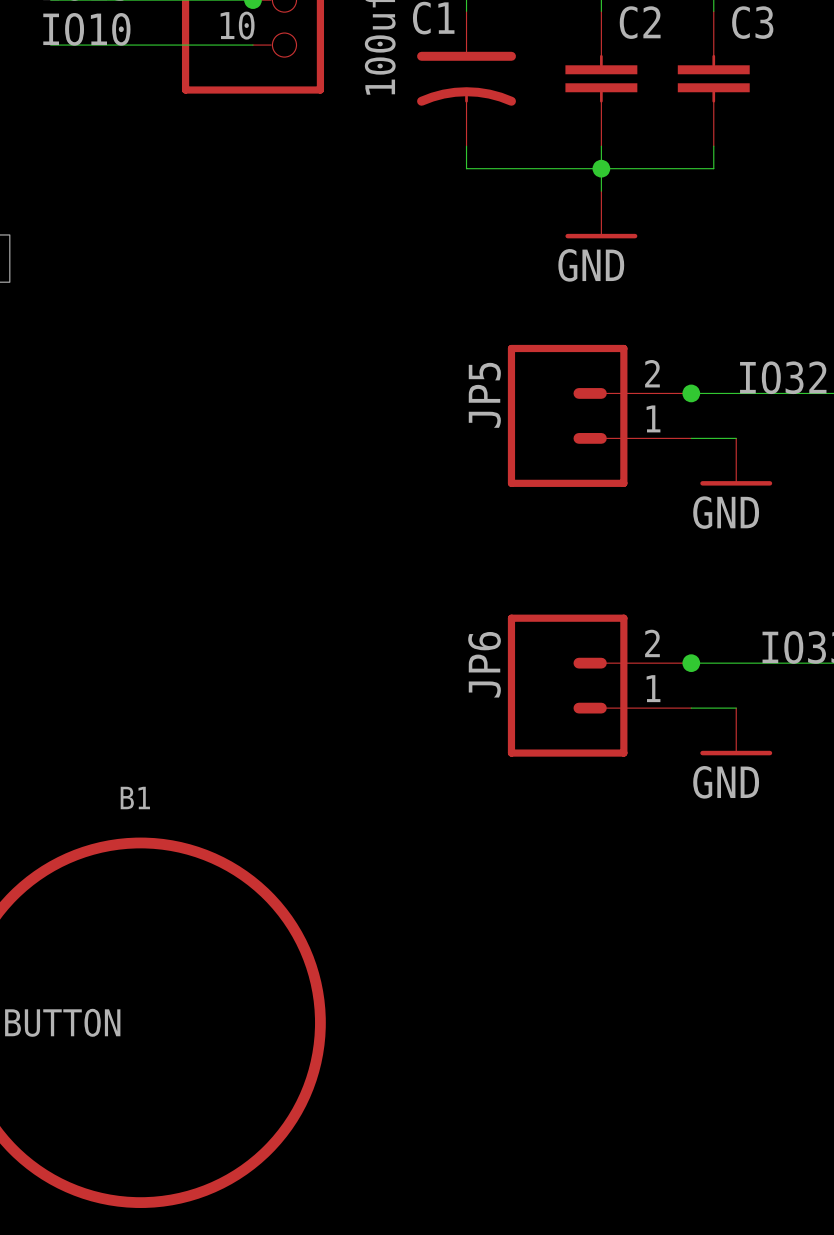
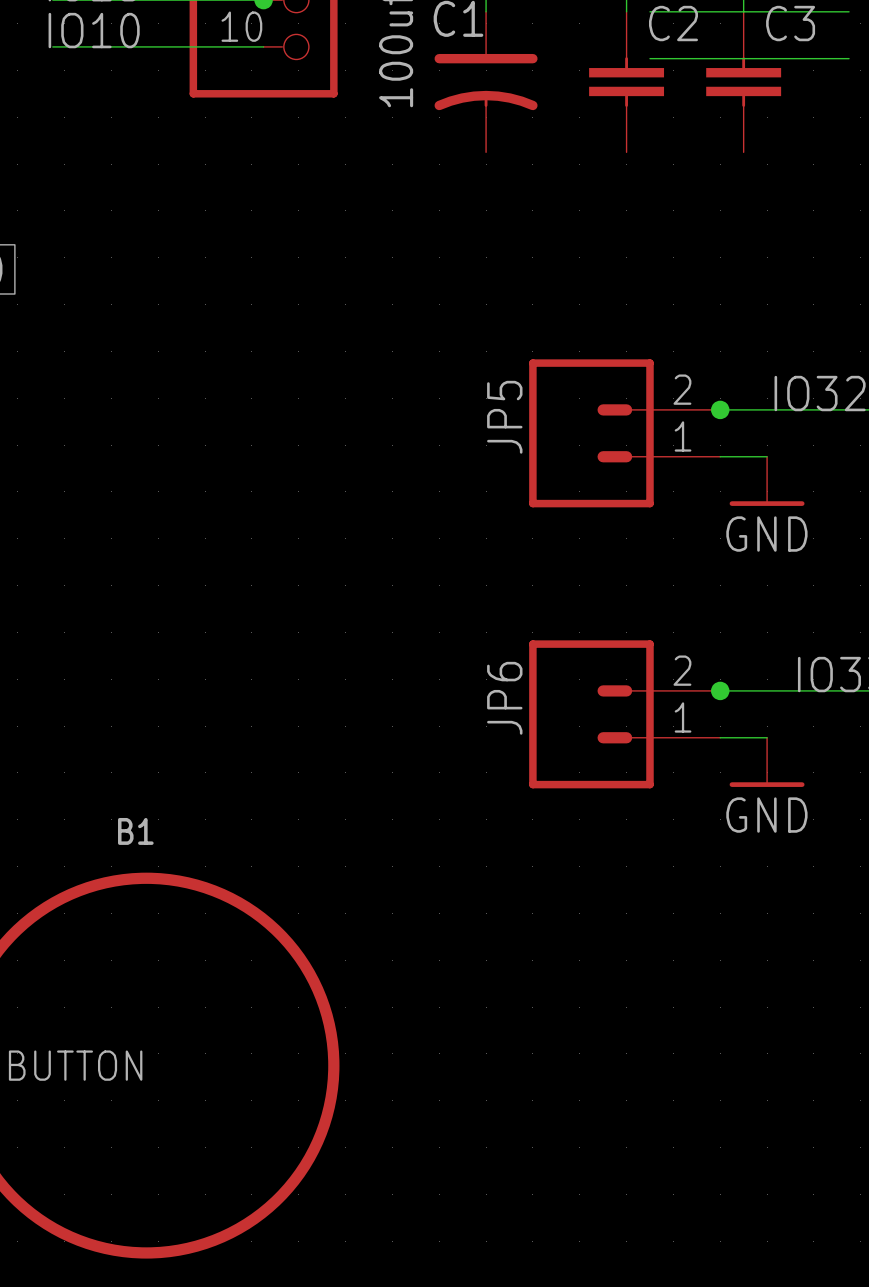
wire: none -> (649, 11) (849, 11)
wire: none -> (649, 58) (849, 58)
wire: (466, 146) (466, 168) (713, 168) (713, 146) -> none
wire: (601, 146) (601, 191) -> none
junction: (601, 168) -> none
power symbol: GND (601, 214) -> none

